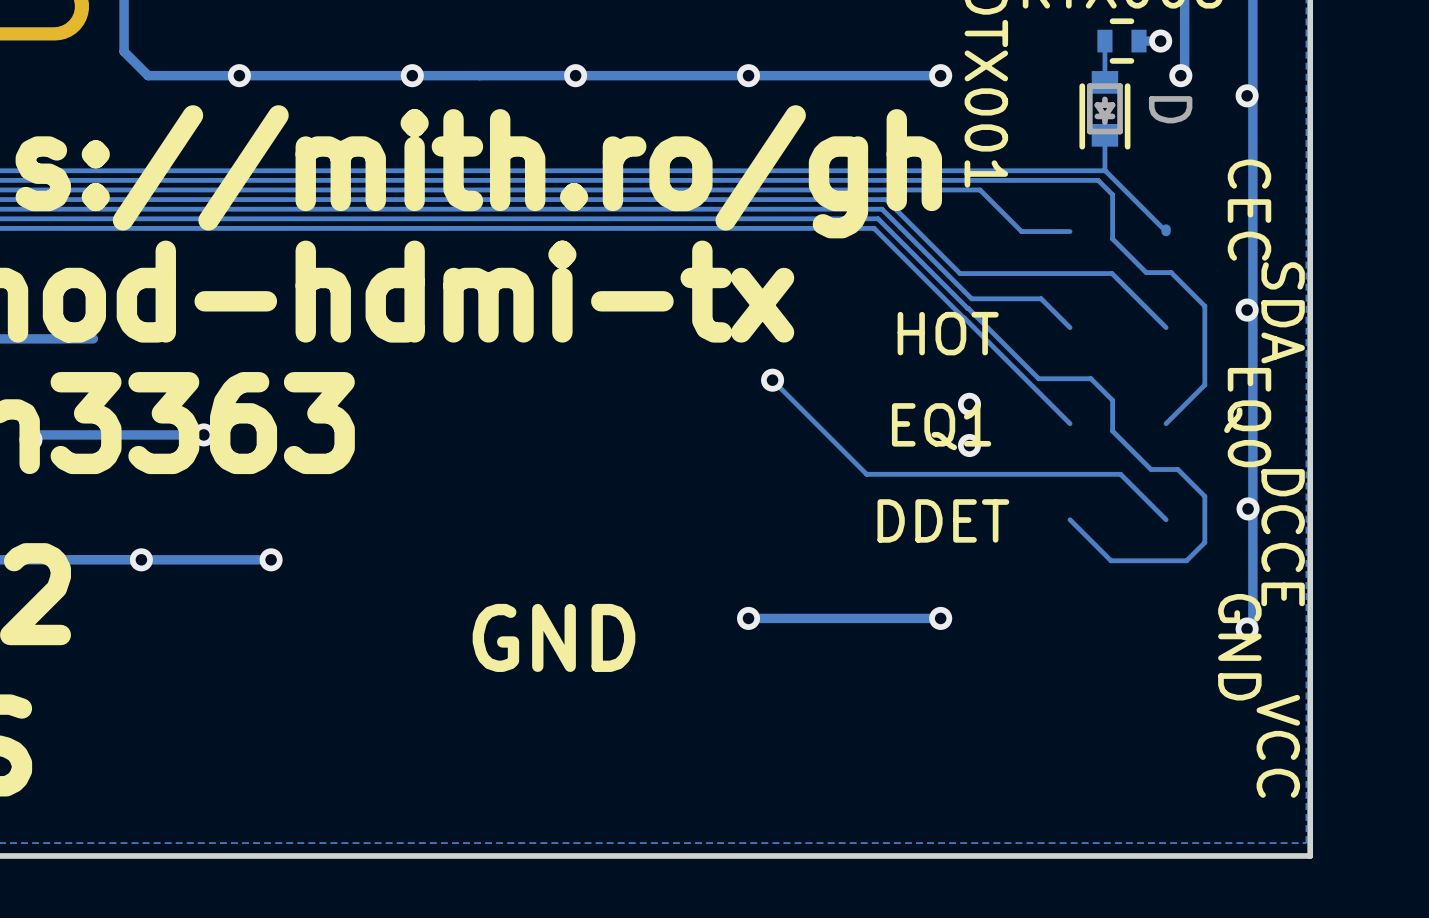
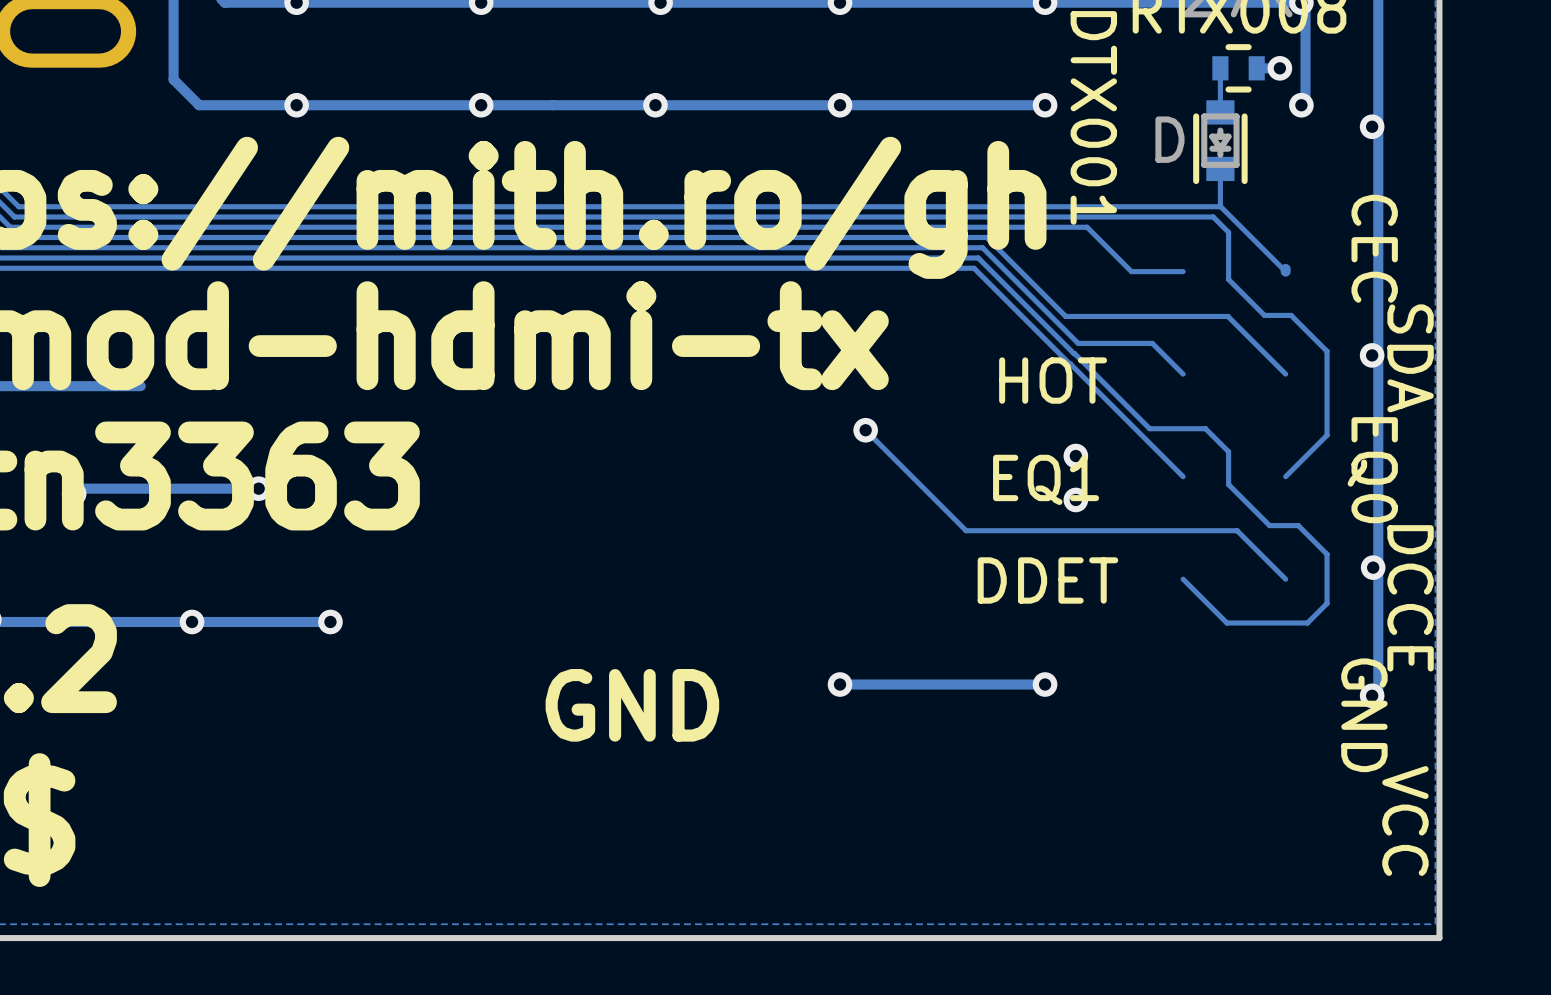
DTX001 value rotation: 0° (1170, 109) -> 90° counterclockwise (1169, 139)
DTX001 value position: D (1170, 109) -> D (1169, 139)

